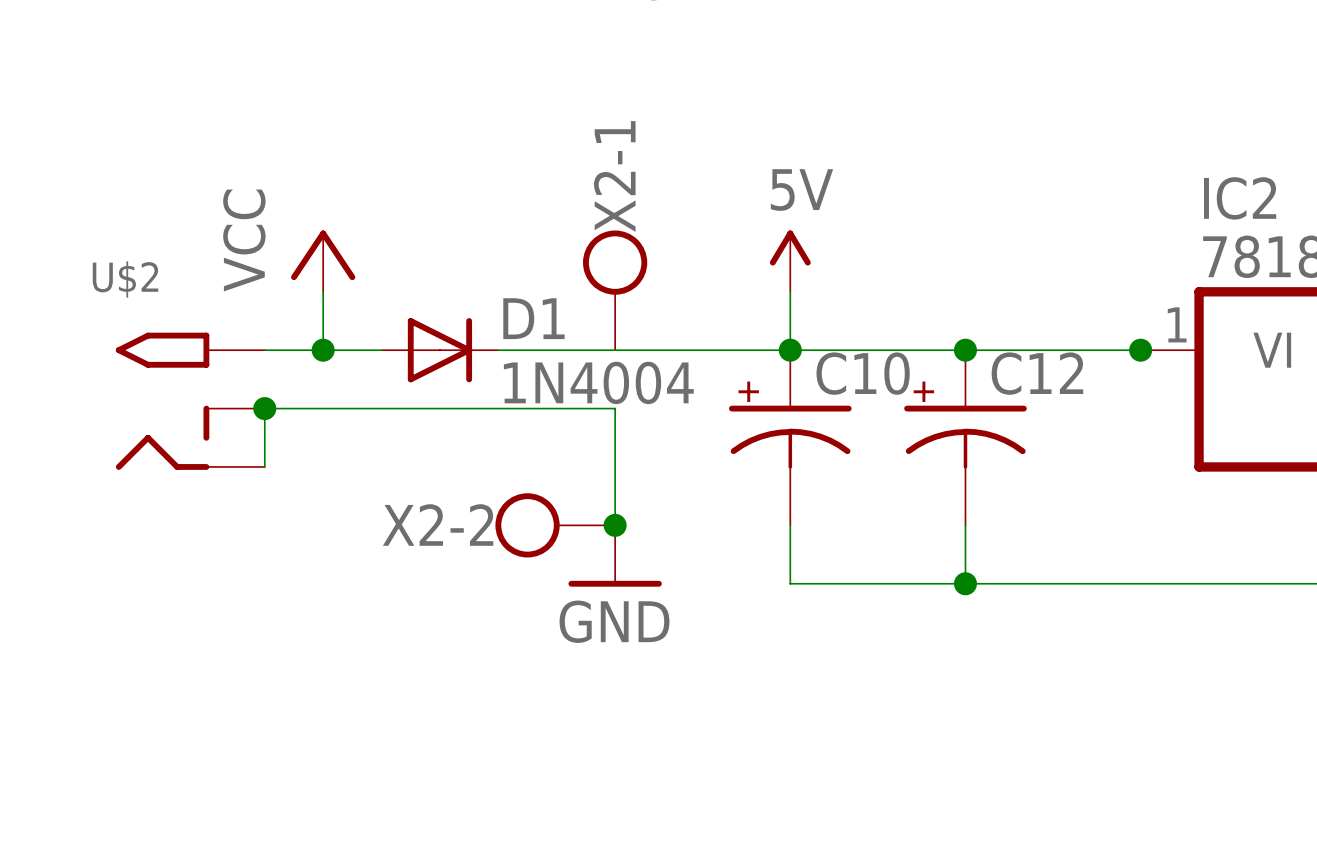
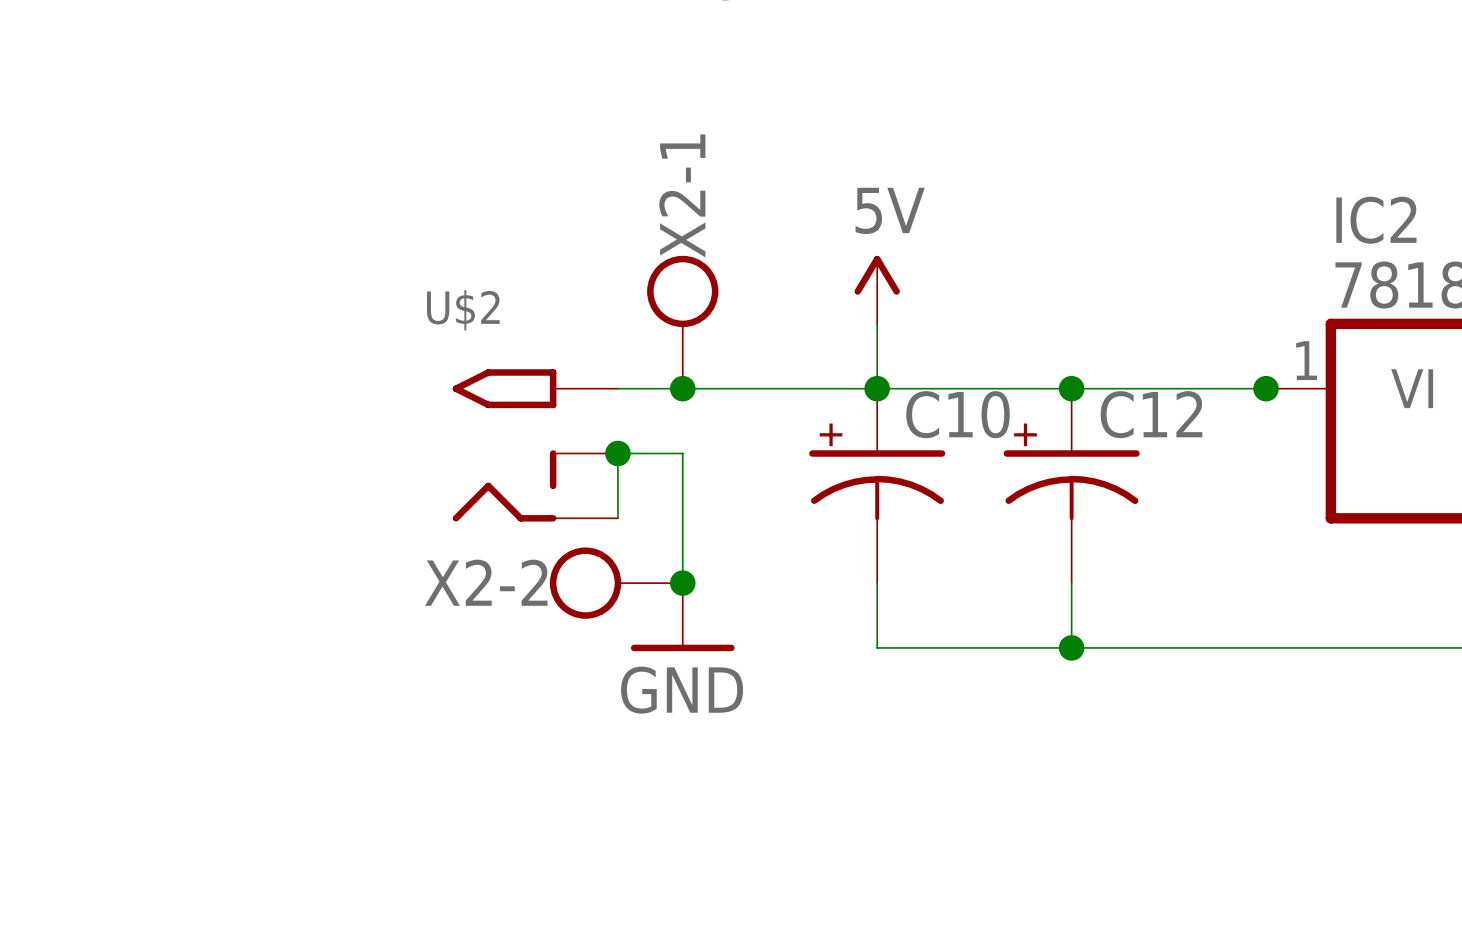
power symbol: VCC (323, 261) -> none
wire: (323, 291) (323, 350) -> none
wire: (264, 350) (381, 350) -> none
junction: (323, 350) -> none
D1: 1N4004 (439, 350) -> none
junction: none -> (682, 388)
U$2 position: (190, 401) -> (535, 445)
junction: (264, 408) -> none
wire: (556, 408) (264, 408) (264, 466) -> (617, 453) (617, 518)
junction: none -> (617, 453)

